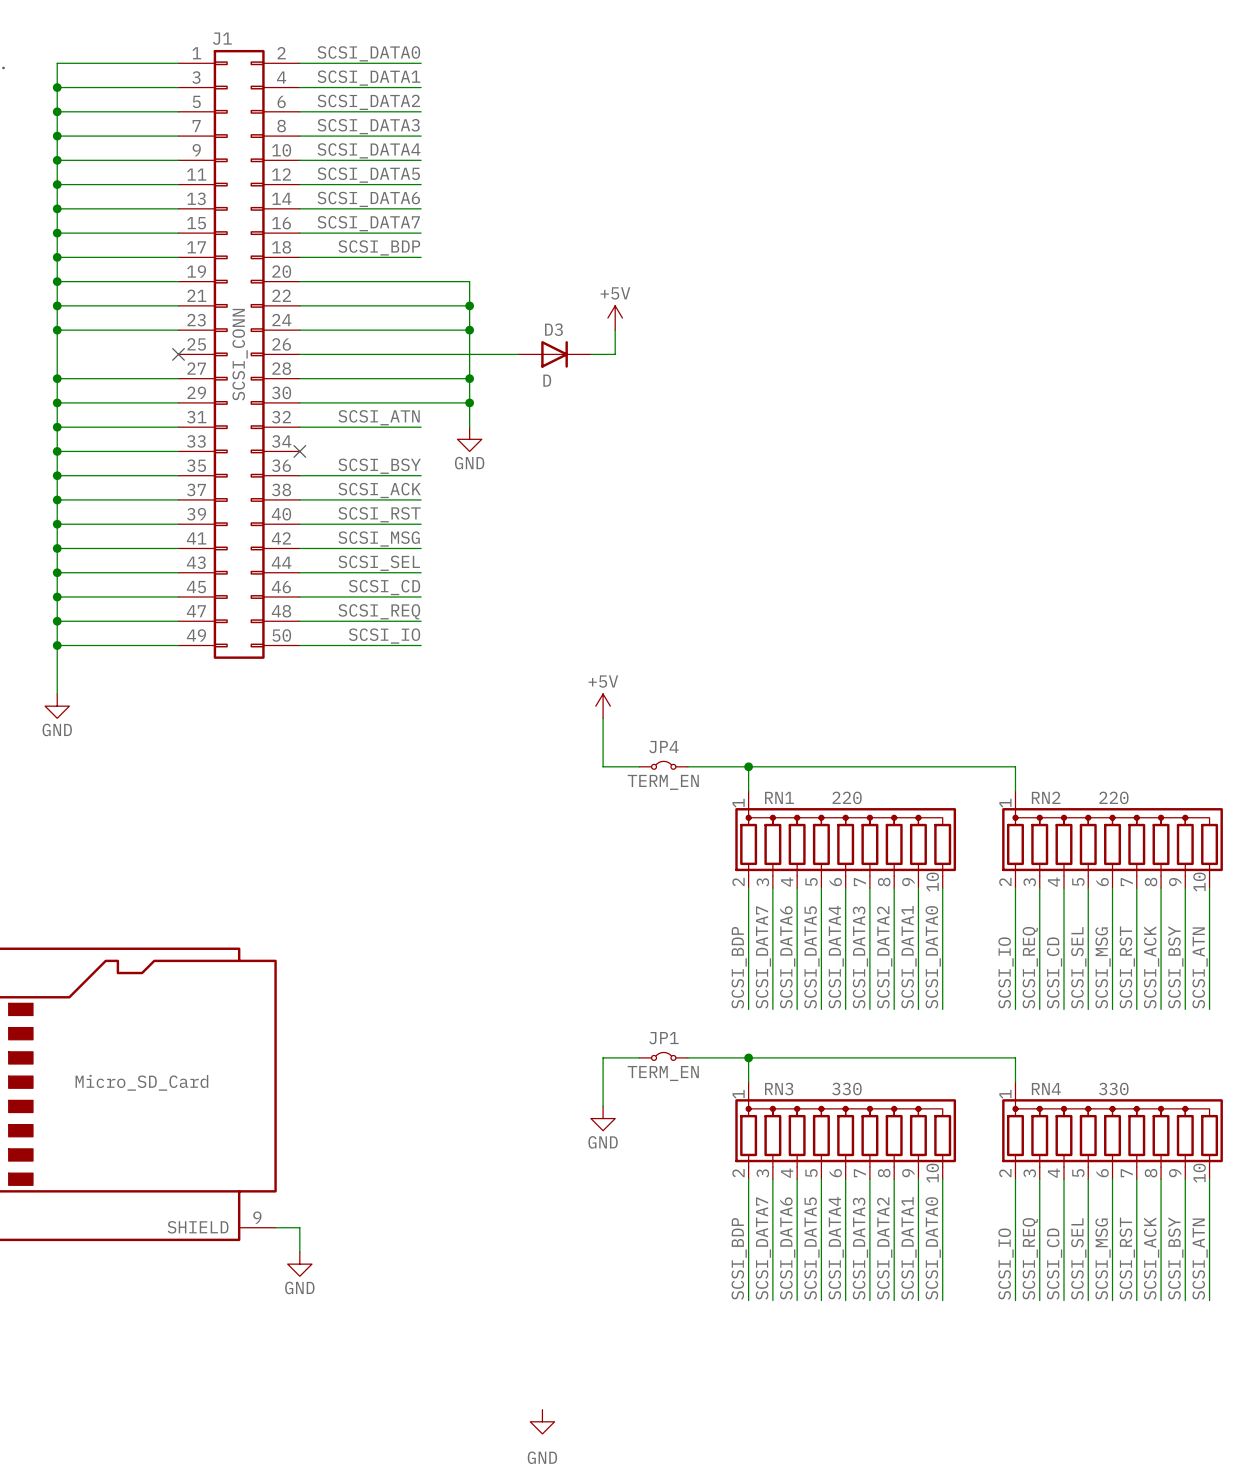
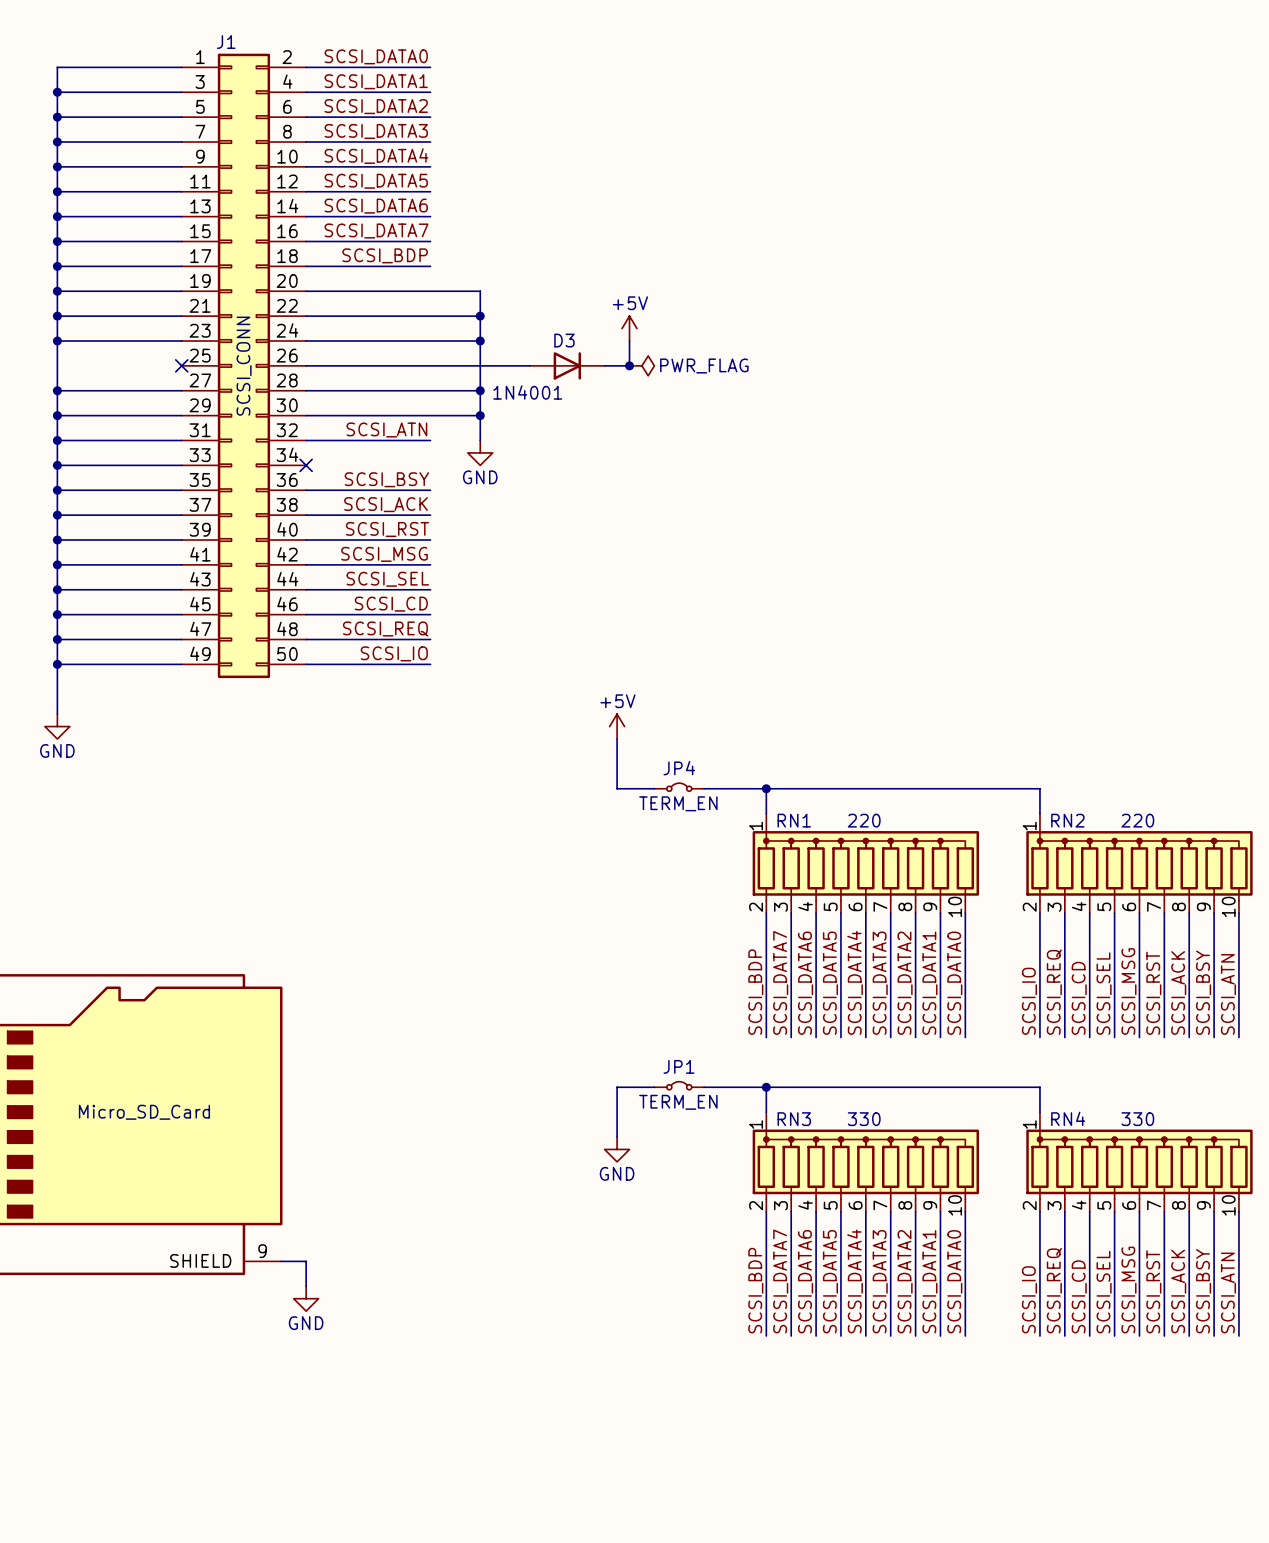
junction: none -> (629, 365)
power symbol: none -> PWR_FLAG (641, 365)
D3 value: D (547, 380) -> 1N4001 (527, 392)
power symbol: GND (542, 1421) -> none

